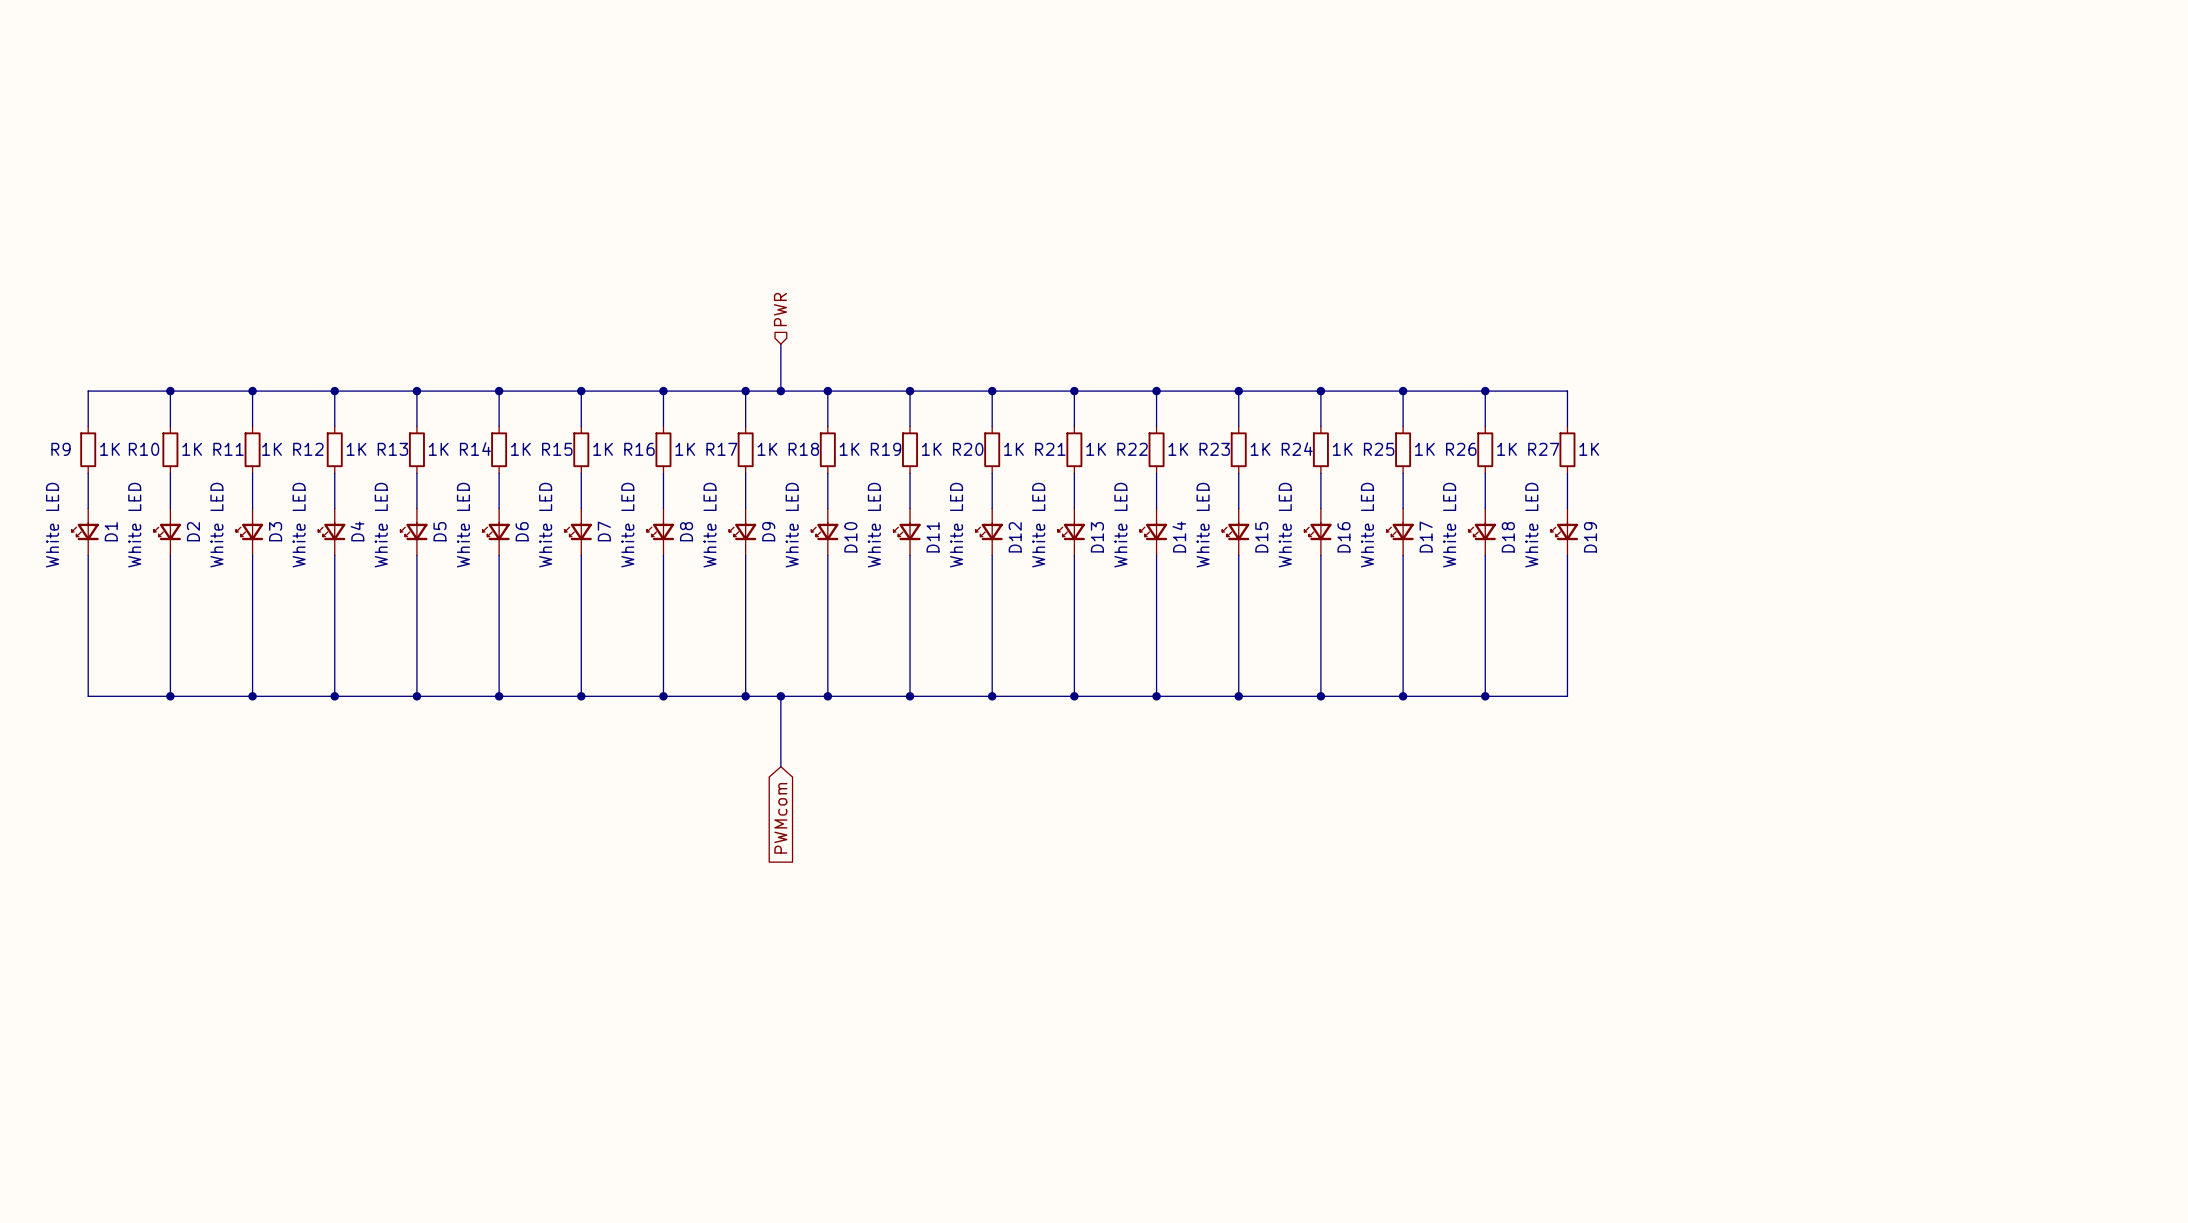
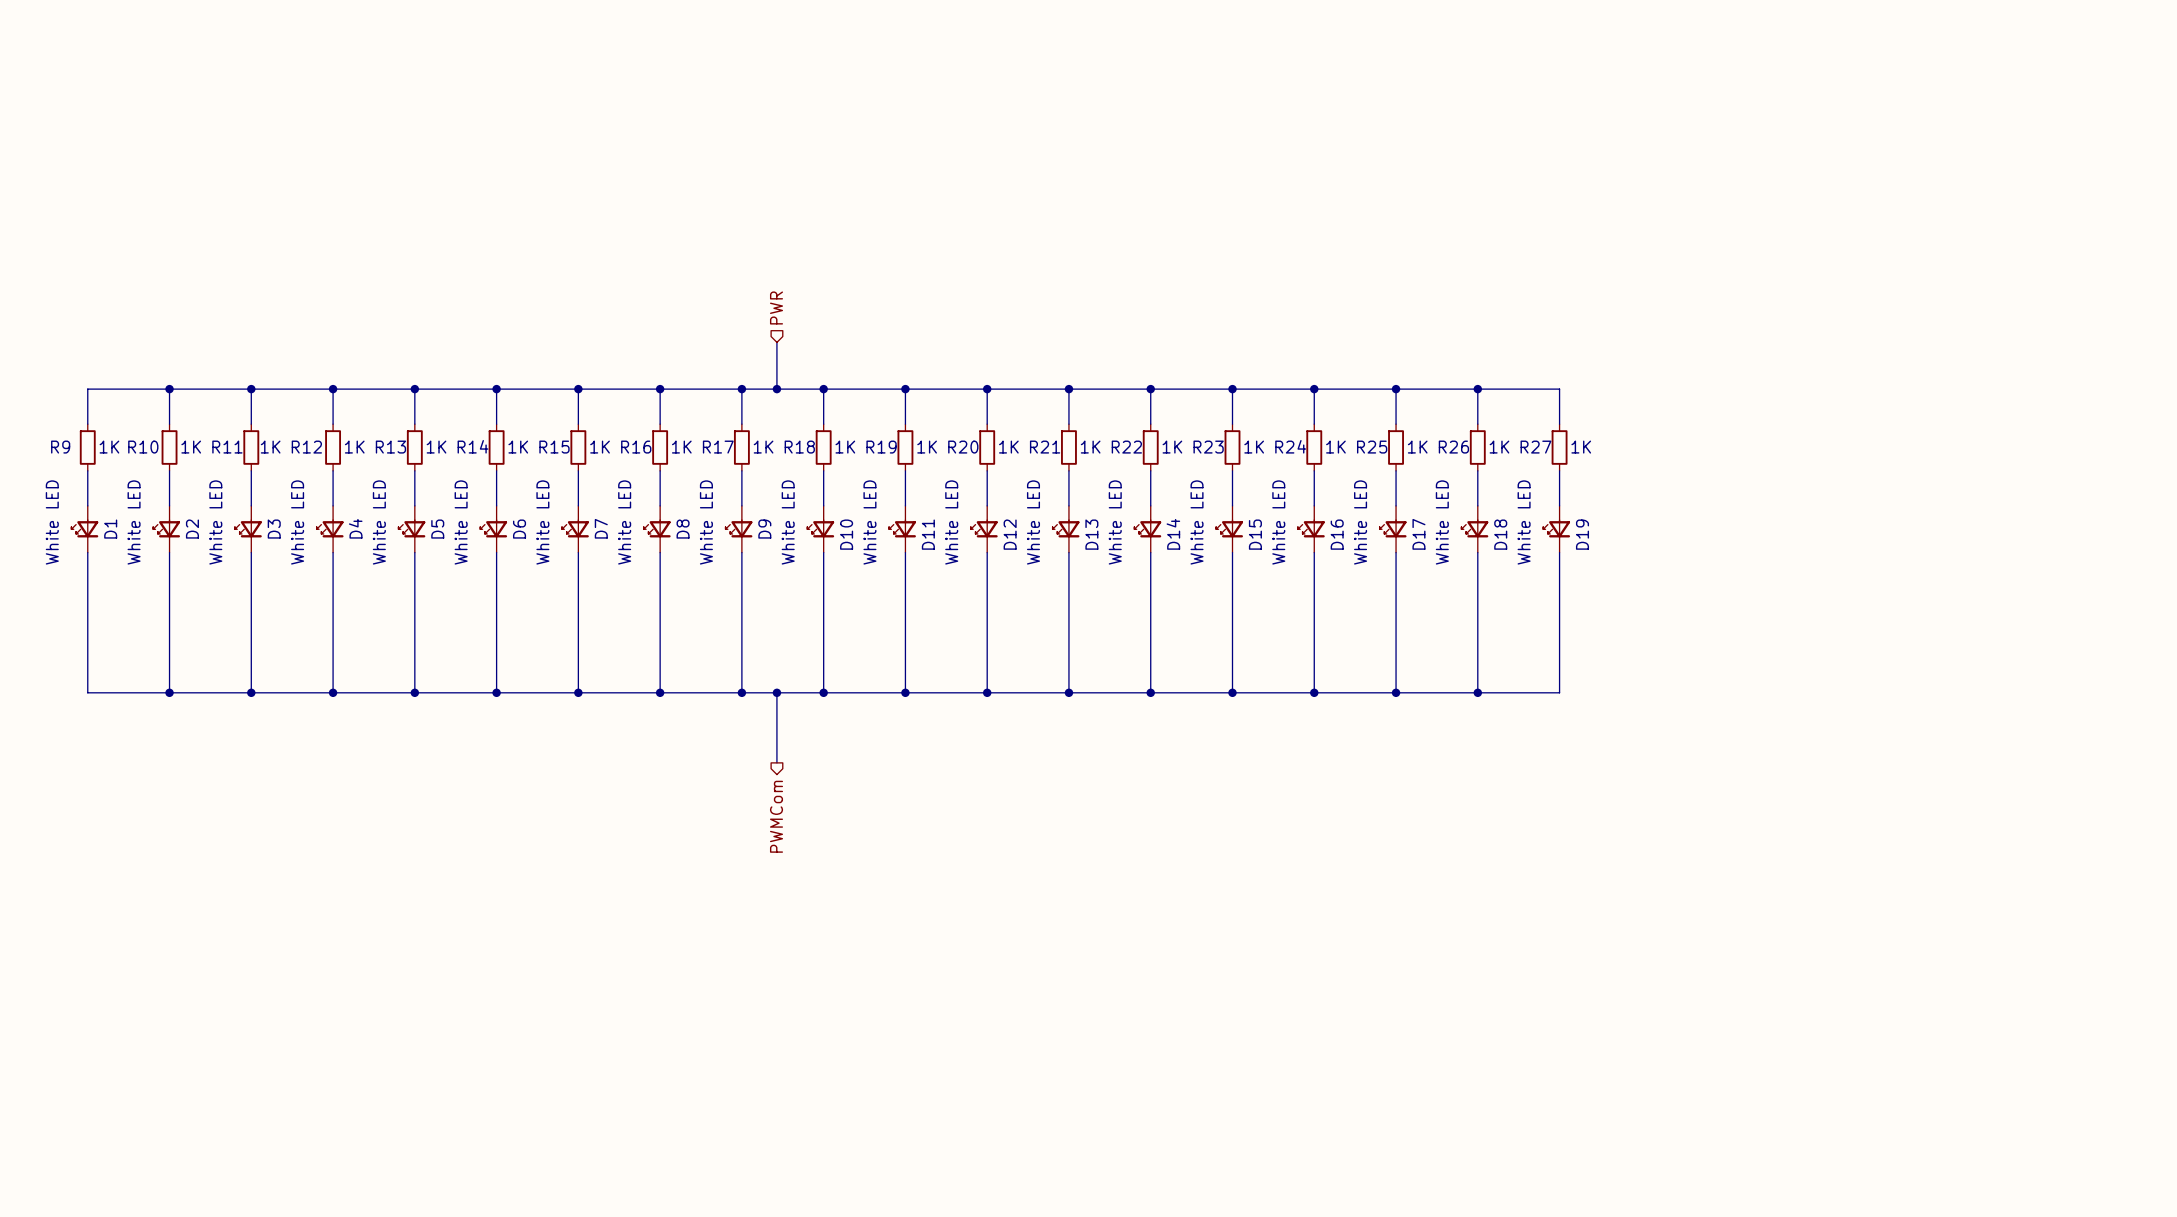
global label: PWMcom (780, 818) -> none
hierarchical label: none -> PWMCom (776, 816)

